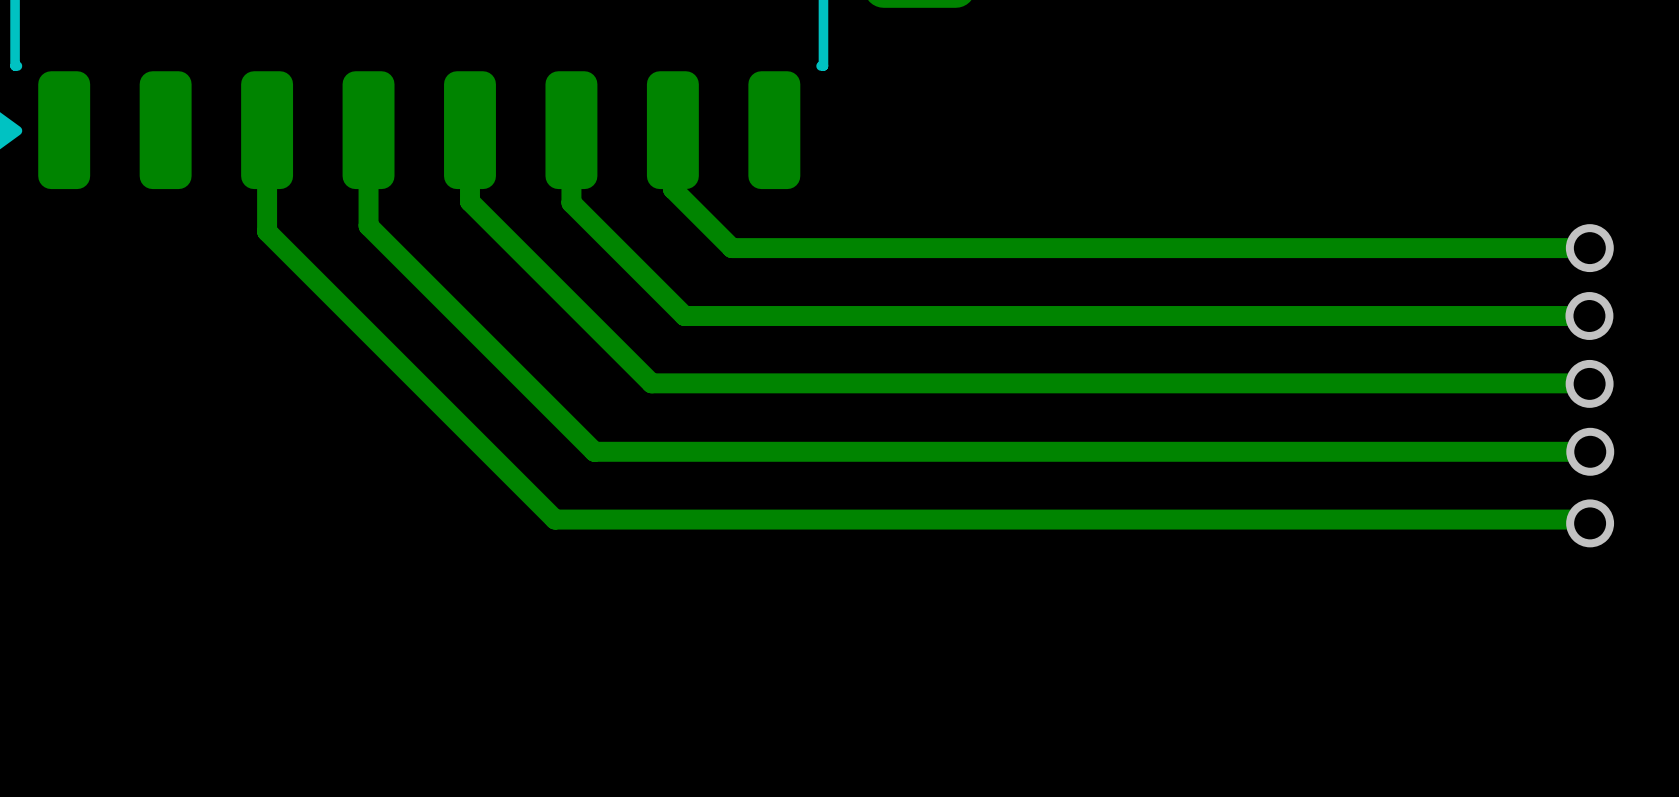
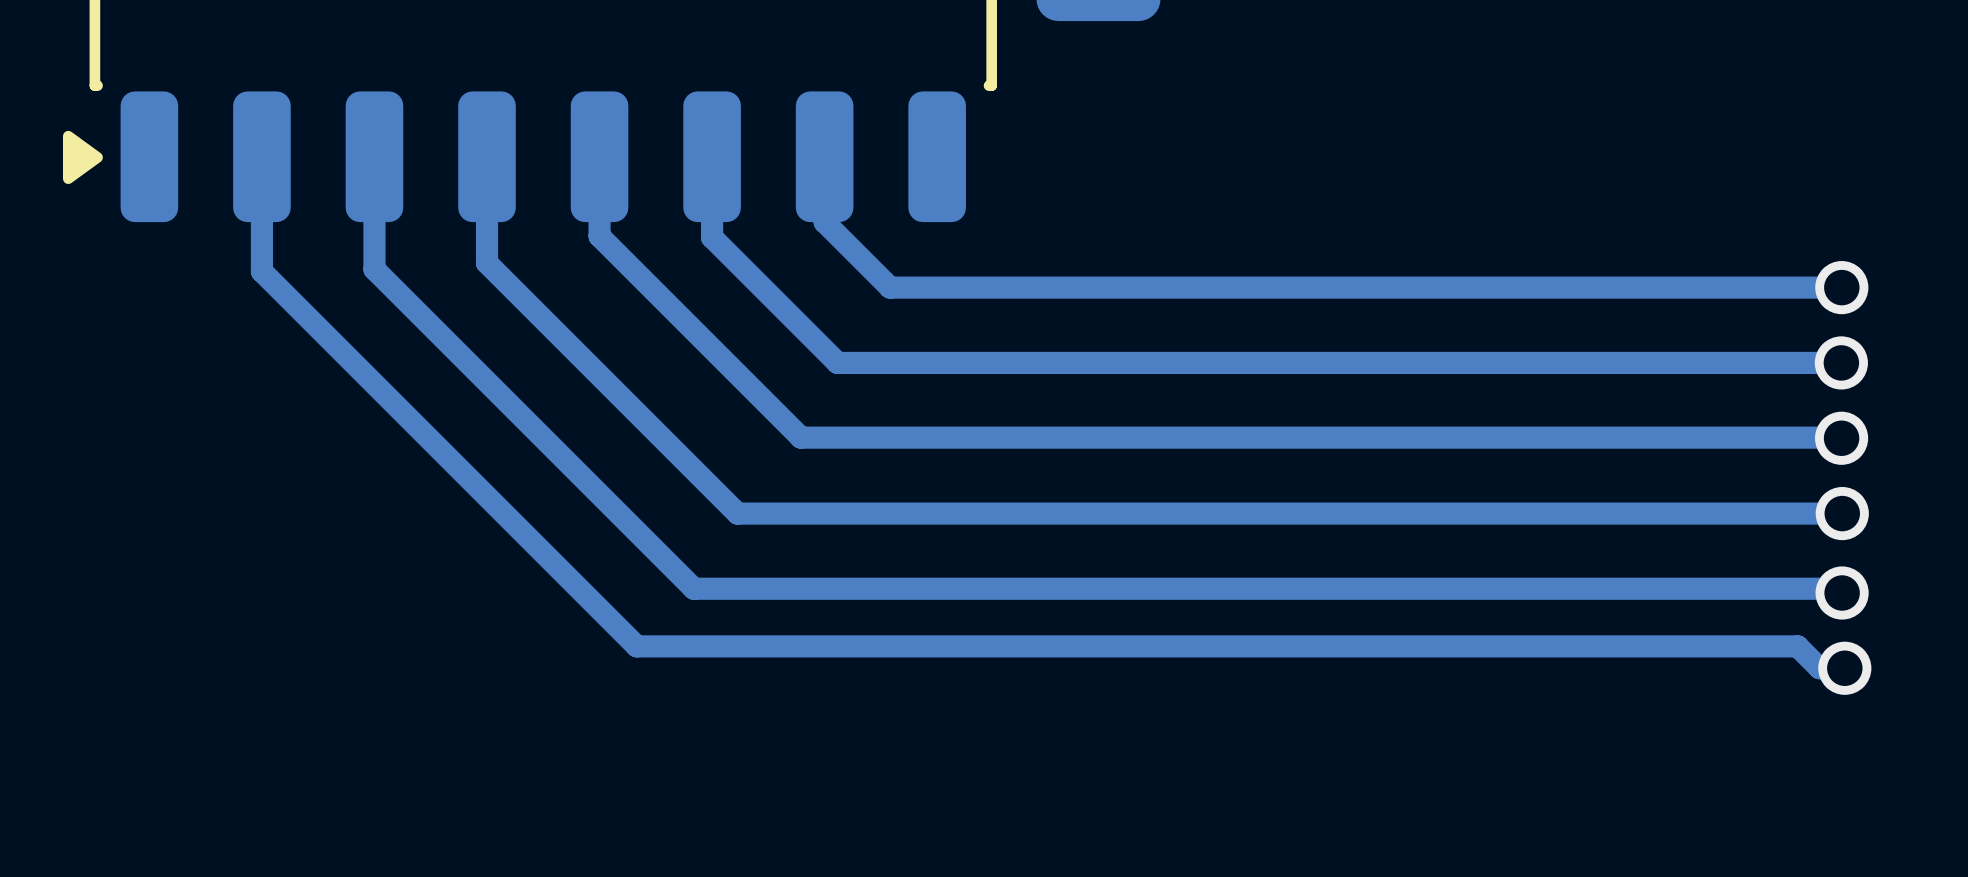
track: none -> (261, 156) (261, 271) (636, 646) (1797, 646) (1819, 668) (1844, 668)
via: none -> (1844, 668)

